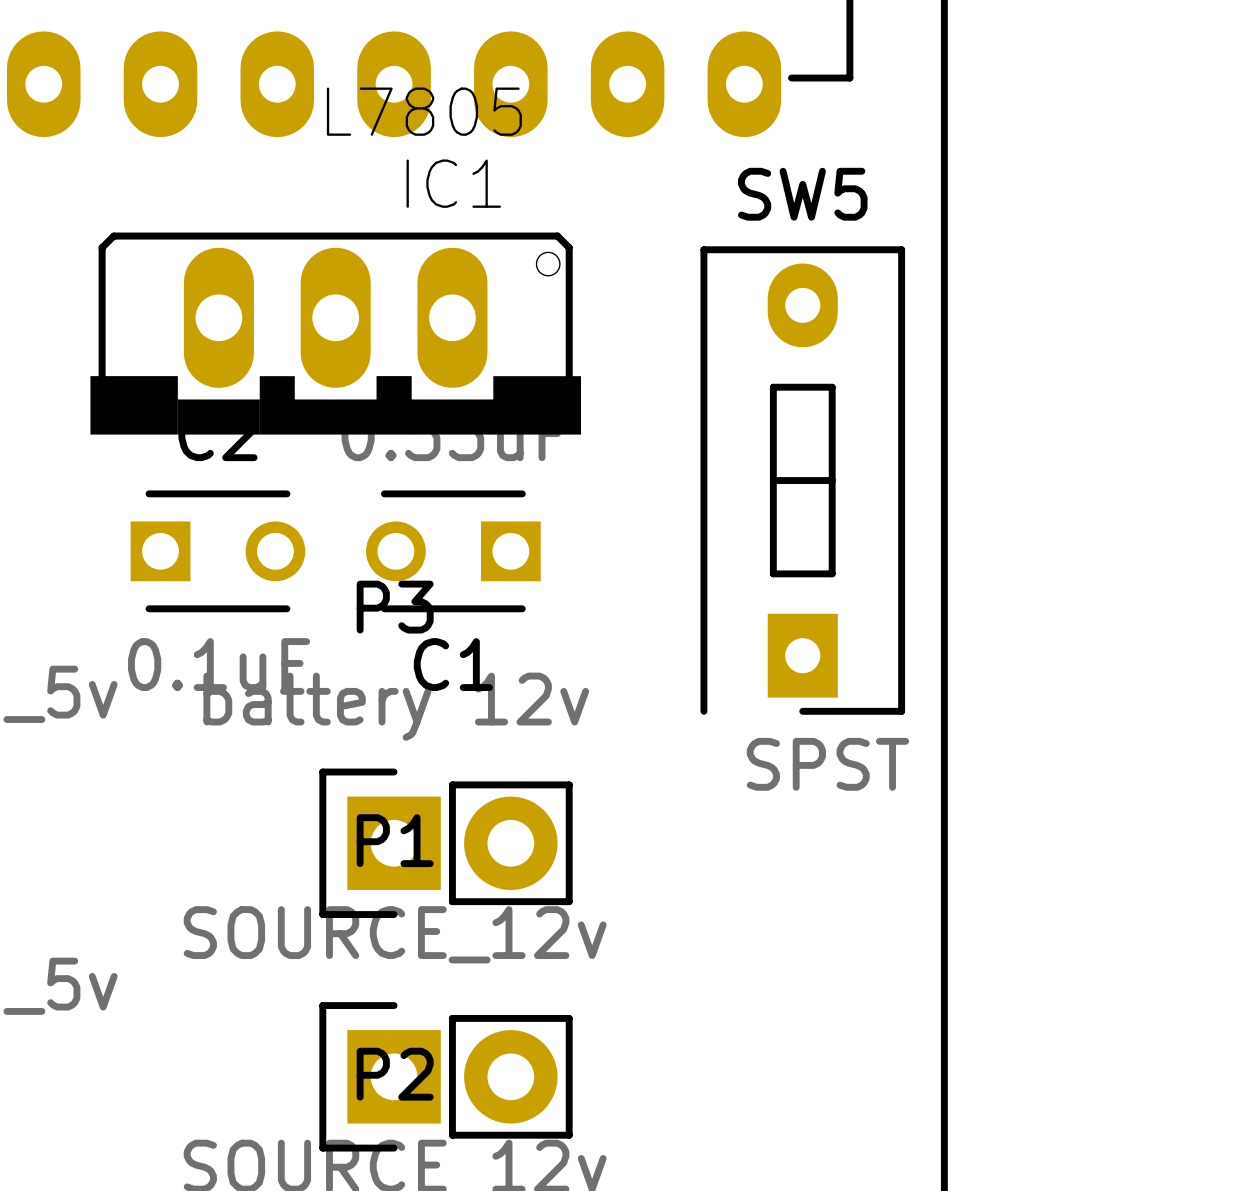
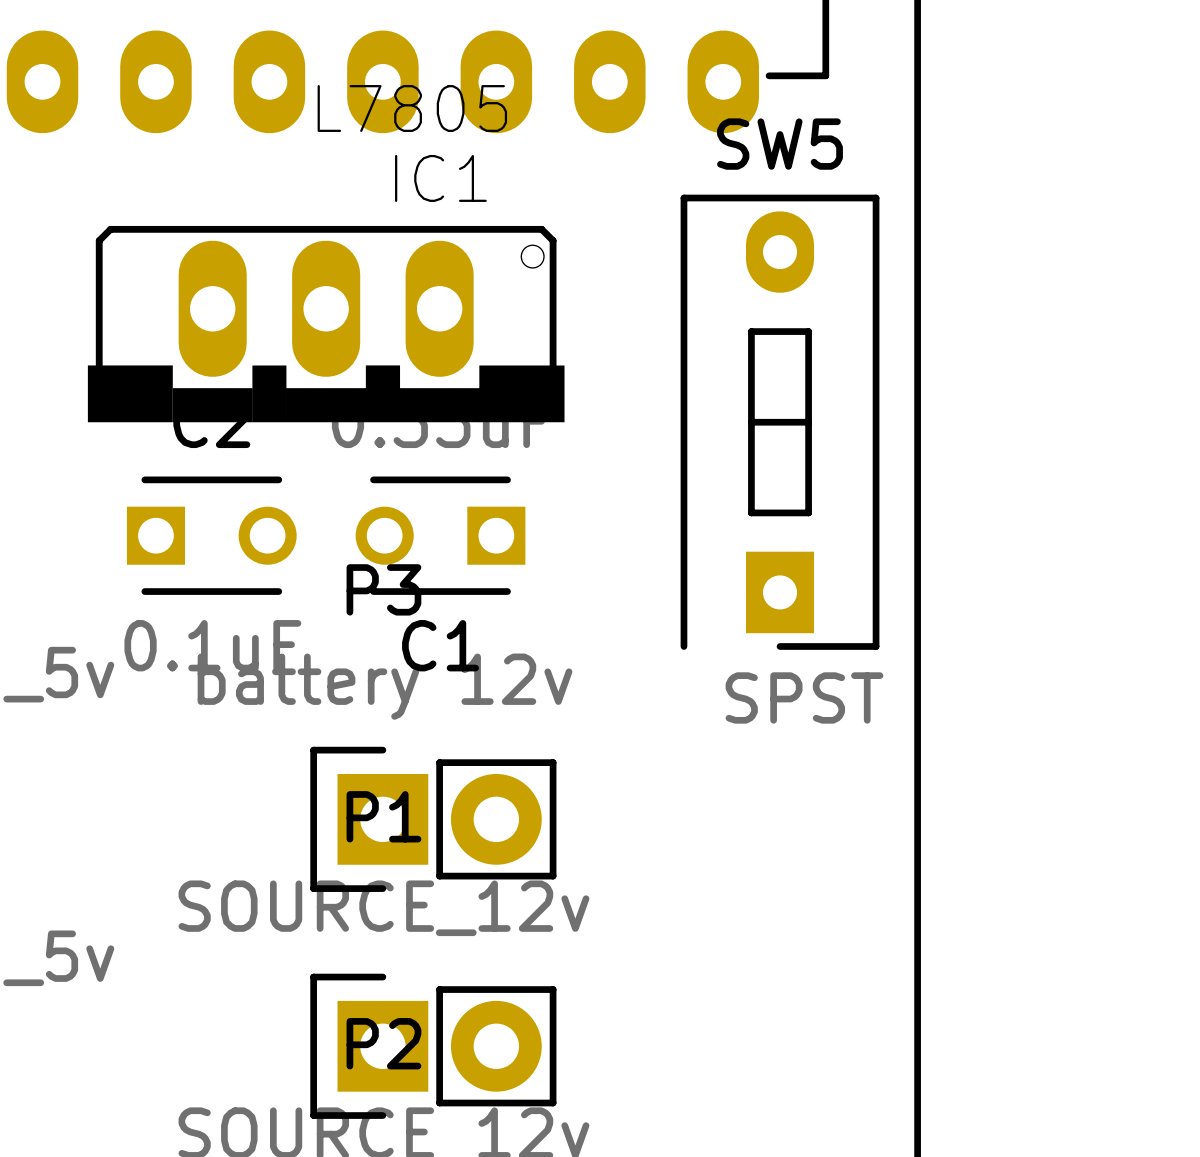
SW5 position: (802, 480) -> (780, 422)

